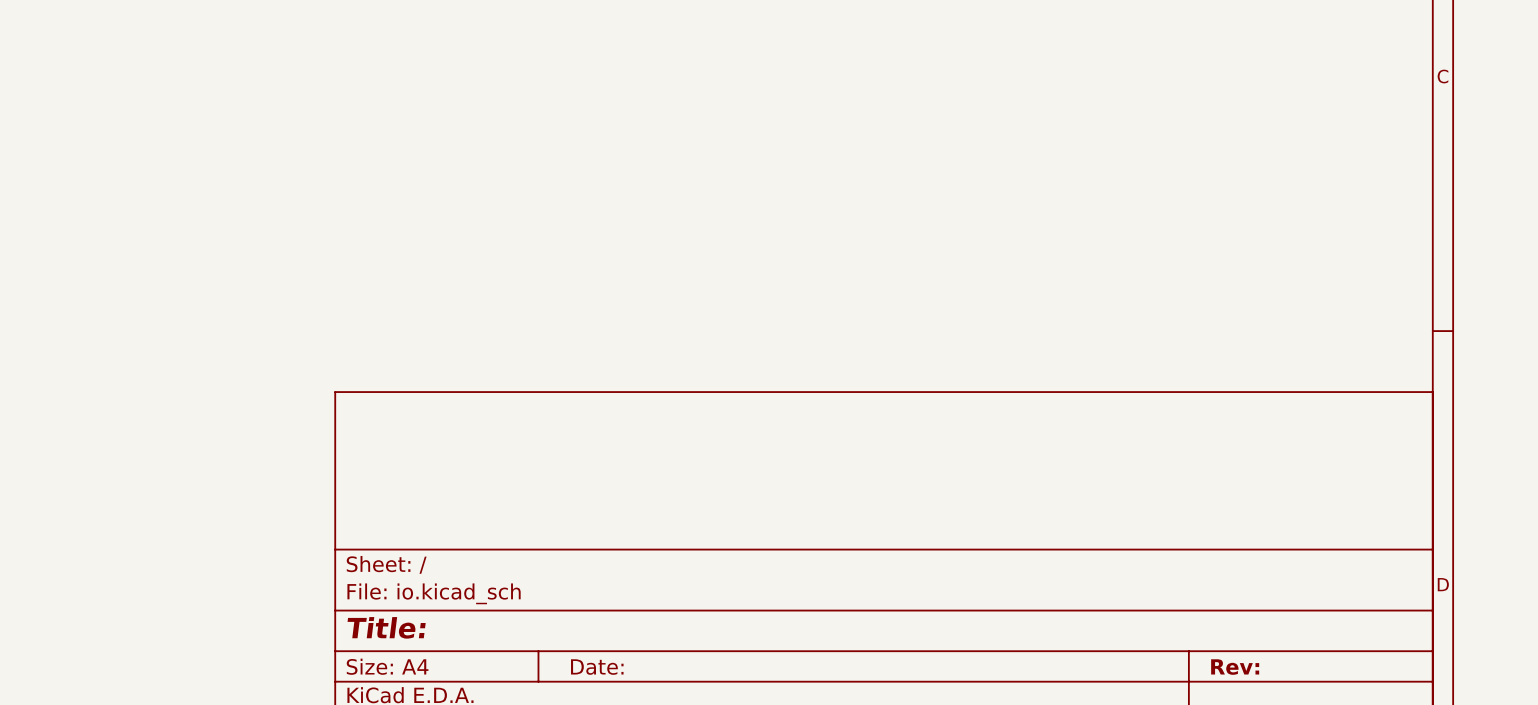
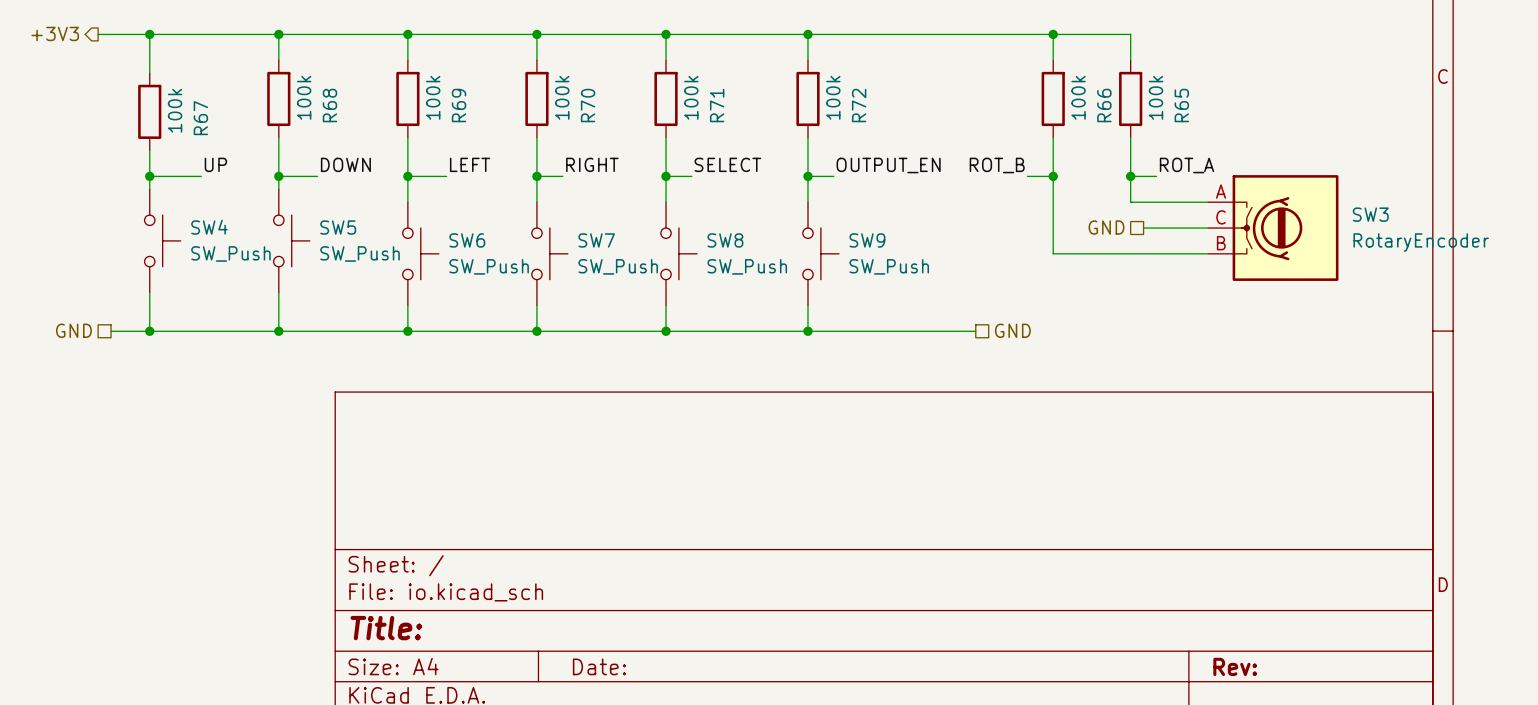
hierarchical label: none -> +3V3 (55, 33)
wire: none -> (98, 34) (1130, 34) (1130, 60)
wire: none -> (149, 34) (149, 73)
junction: none -> (149, 34)
wire: none -> (278, 34) (278, 60)
junction: none -> (278, 34)
wire: none -> (407, 34) (407, 60)
junction: none -> (407, 34)
wire: none -> (536, 34) (536, 60)
junction: none -> (536, 34)
wire: none -> (666, 34) (666, 60)
junction: none -> (666, 34)
wire: none -> (807, 34) (807, 60)
junction: none -> (807, 34)
wire: none -> (1053, 34) (1053, 60)
junction: none -> (1053, 34)
R68: none -> 100k (278, 98)
R69: none -> 100k (407, 98)
R70: none -> 100k (536, 98)
R71: none -> 100k (666, 98)
R72: none -> 100k (807, 98)
R66: none -> 100k (1053, 98)
R65: none -> 100k (1130, 98)
R67: none -> 100k (149, 111)
wire: none -> (278, 137) (278, 189)
wire: none -> (407, 137) (407, 202)
wire: none -> (536, 137) (536, 202)
wire: none -> (666, 137) (666, 202)
wire: none -> (807, 137) (807, 202)
wire: none -> (1053, 137) (1053, 253) (1208, 253)
wire: none -> (1130, 137) (1130, 202) (1208, 202)
wire: none -> (149, 150) (149, 189)
label: none -> DOWN (345, 164)
label: none -> LEFT (470, 164)
label: none -> RIGHT (592, 164)
label: none -> SELECT (727, 164)
label: none -> UP (215, 164)
label: none -> OUTPUT_EN (888, 165)
label: none -> ROT_B (997, 165)
label: none -> ROT_A (1186, 165)
wire: none -> (149, 176) (201, 176)
junction: none -> (149, 176)
wire: none -> (278, 176) (317, 176)
junction: none -> (278, 176)
wire: none -> (407, 176) (446, 176)
junction: none -> (407, 176)
wire: none -> (536, 176) (562, 176)
junction: none -> (536, 176)
wire: none -> (666, 176) (691, 176)
junction: none -> (666, 176)
wire: none -> (807, 176) (833, 176)
junction: none -> (807, 176)
wire: none -> (1027, 176) (1053, 176)
junction: none -> (1053, 176)
wire: none -> (1130, 176) (1156, 176)
junction: none -> (1130, 176)
hierarchical label: none -> GND (1106, 227)
wire: none -> (1143, 228) (1208, 228)
SW3: none -> RotaryEncoder (1273, 228)
SW4: none -> SW_Push (162, 240)
SW5: none -> SW_Push (291, 240)
SW6: none -> SW_Push (420, 253)
SW7: none -> SW_Push (549, 253)
SW8: none -> SW_Push (678, 253)
SW9: none -> SW_Push (820, 253)
wire: none -> (149, 292) (149, 331)
wire: none -> (278, 292) (278, 331)
wire: none -> (407, 305) (407, 331)
wire: none -> (536, 305) (536, 331)
wire: none -> (666, 305) (666, 331)
wire: none -> (807, 305) (807, 331)
hierarchical label: none -> GND (73, 330)
hierarchical label: none -> GND (1012, 330)
wire: none -> (111, 331) (975, 331)
junction: none -> (149, 331)
junction: none -> (278, 331)
junction: none -> (407, 331)
junction: none -> (536, 331)
junction: none -> (666, 331)
junction: none -> (807, 331)

